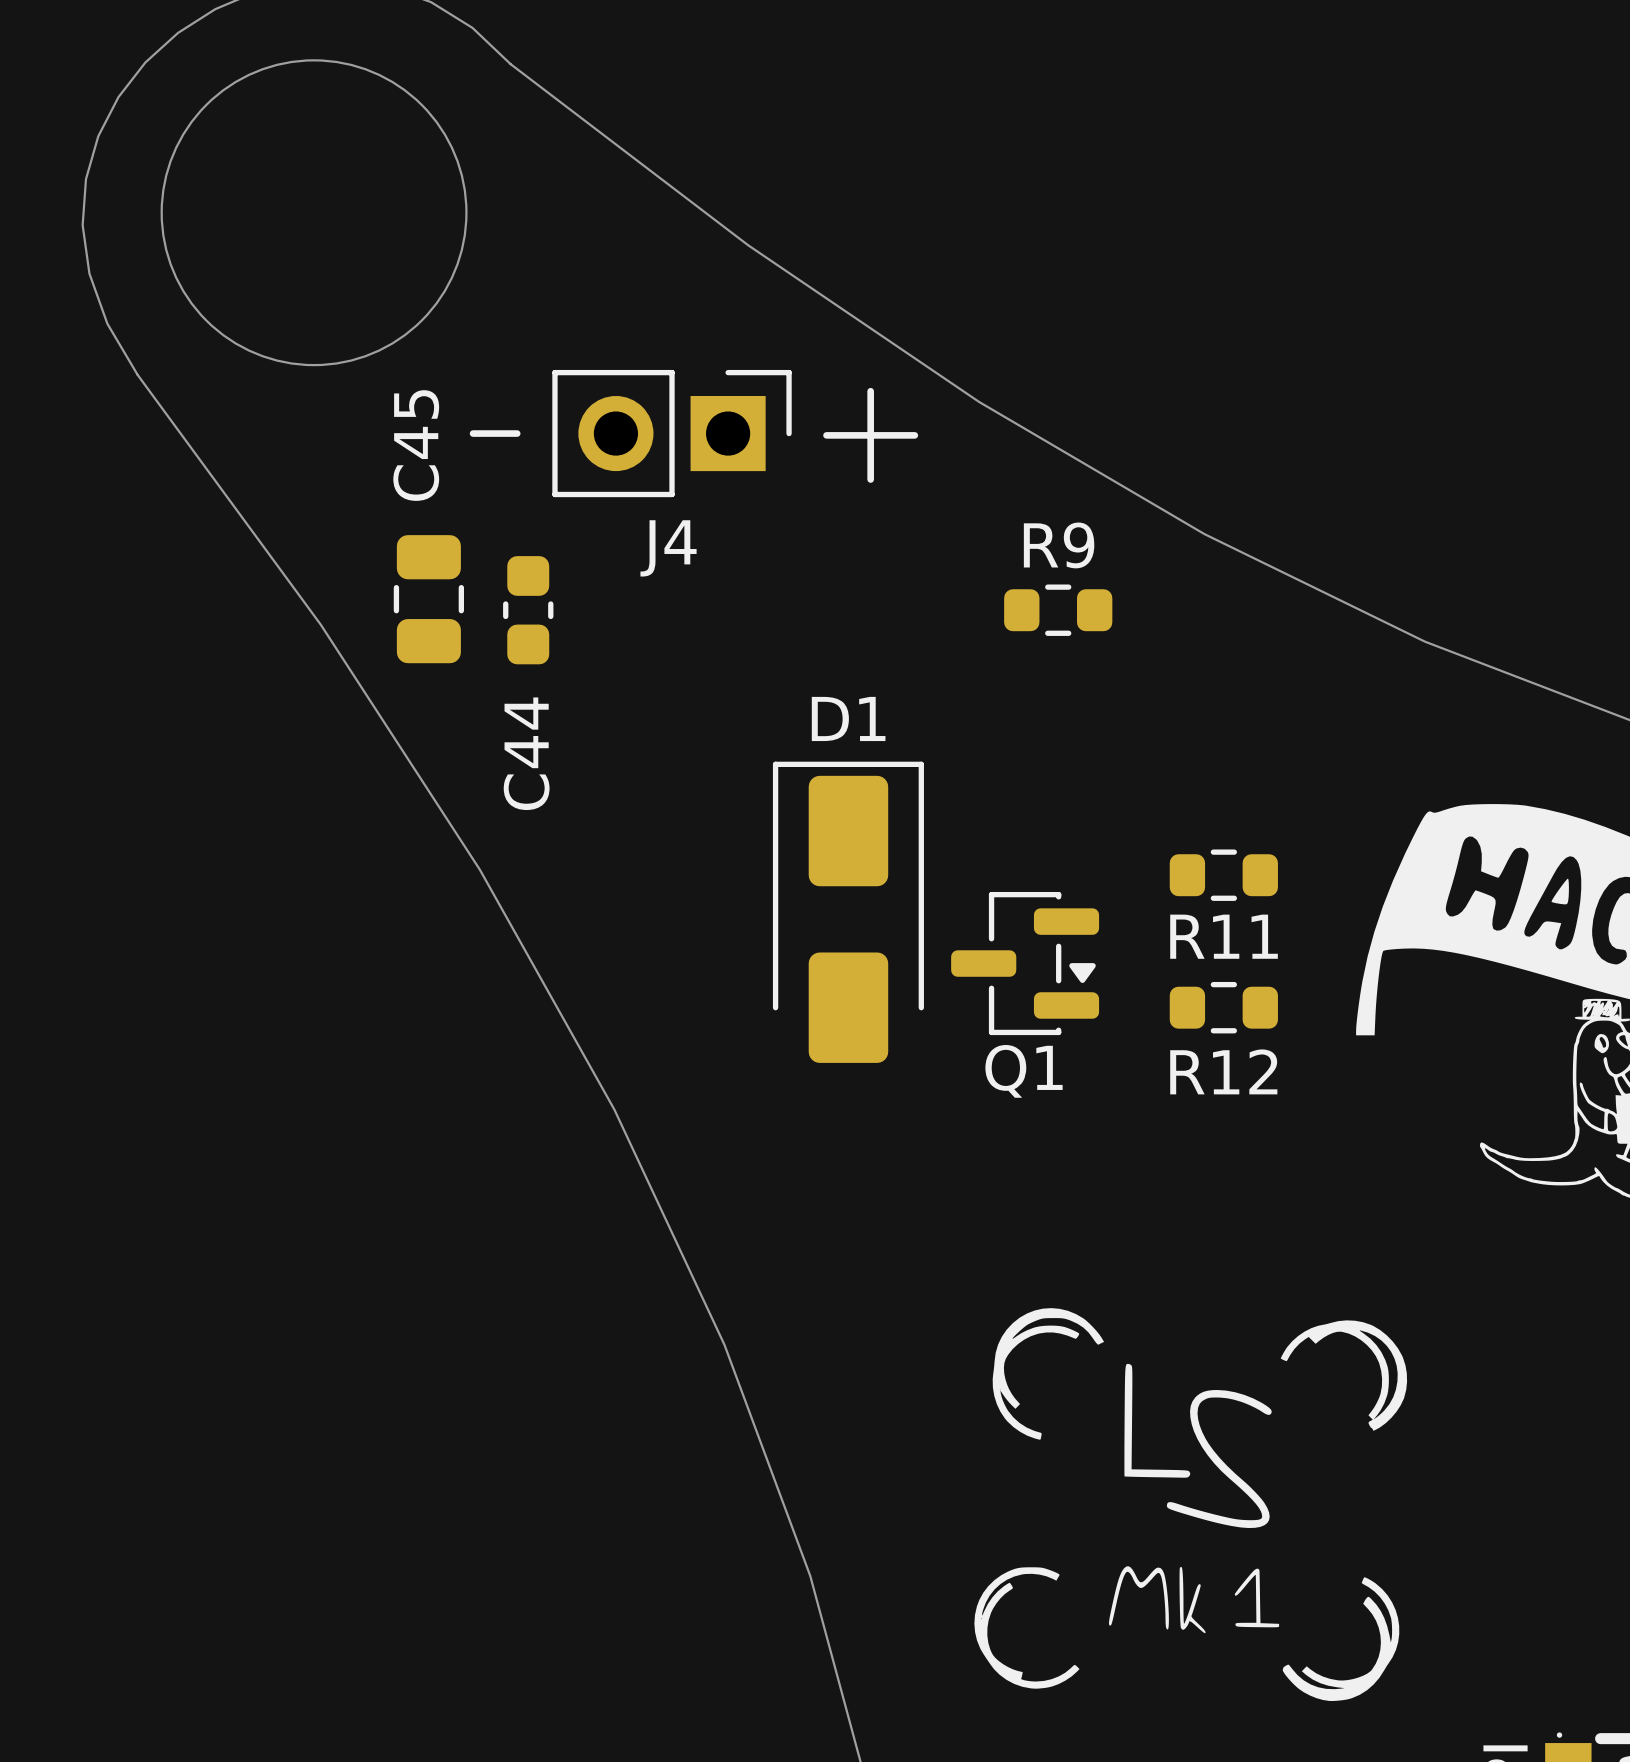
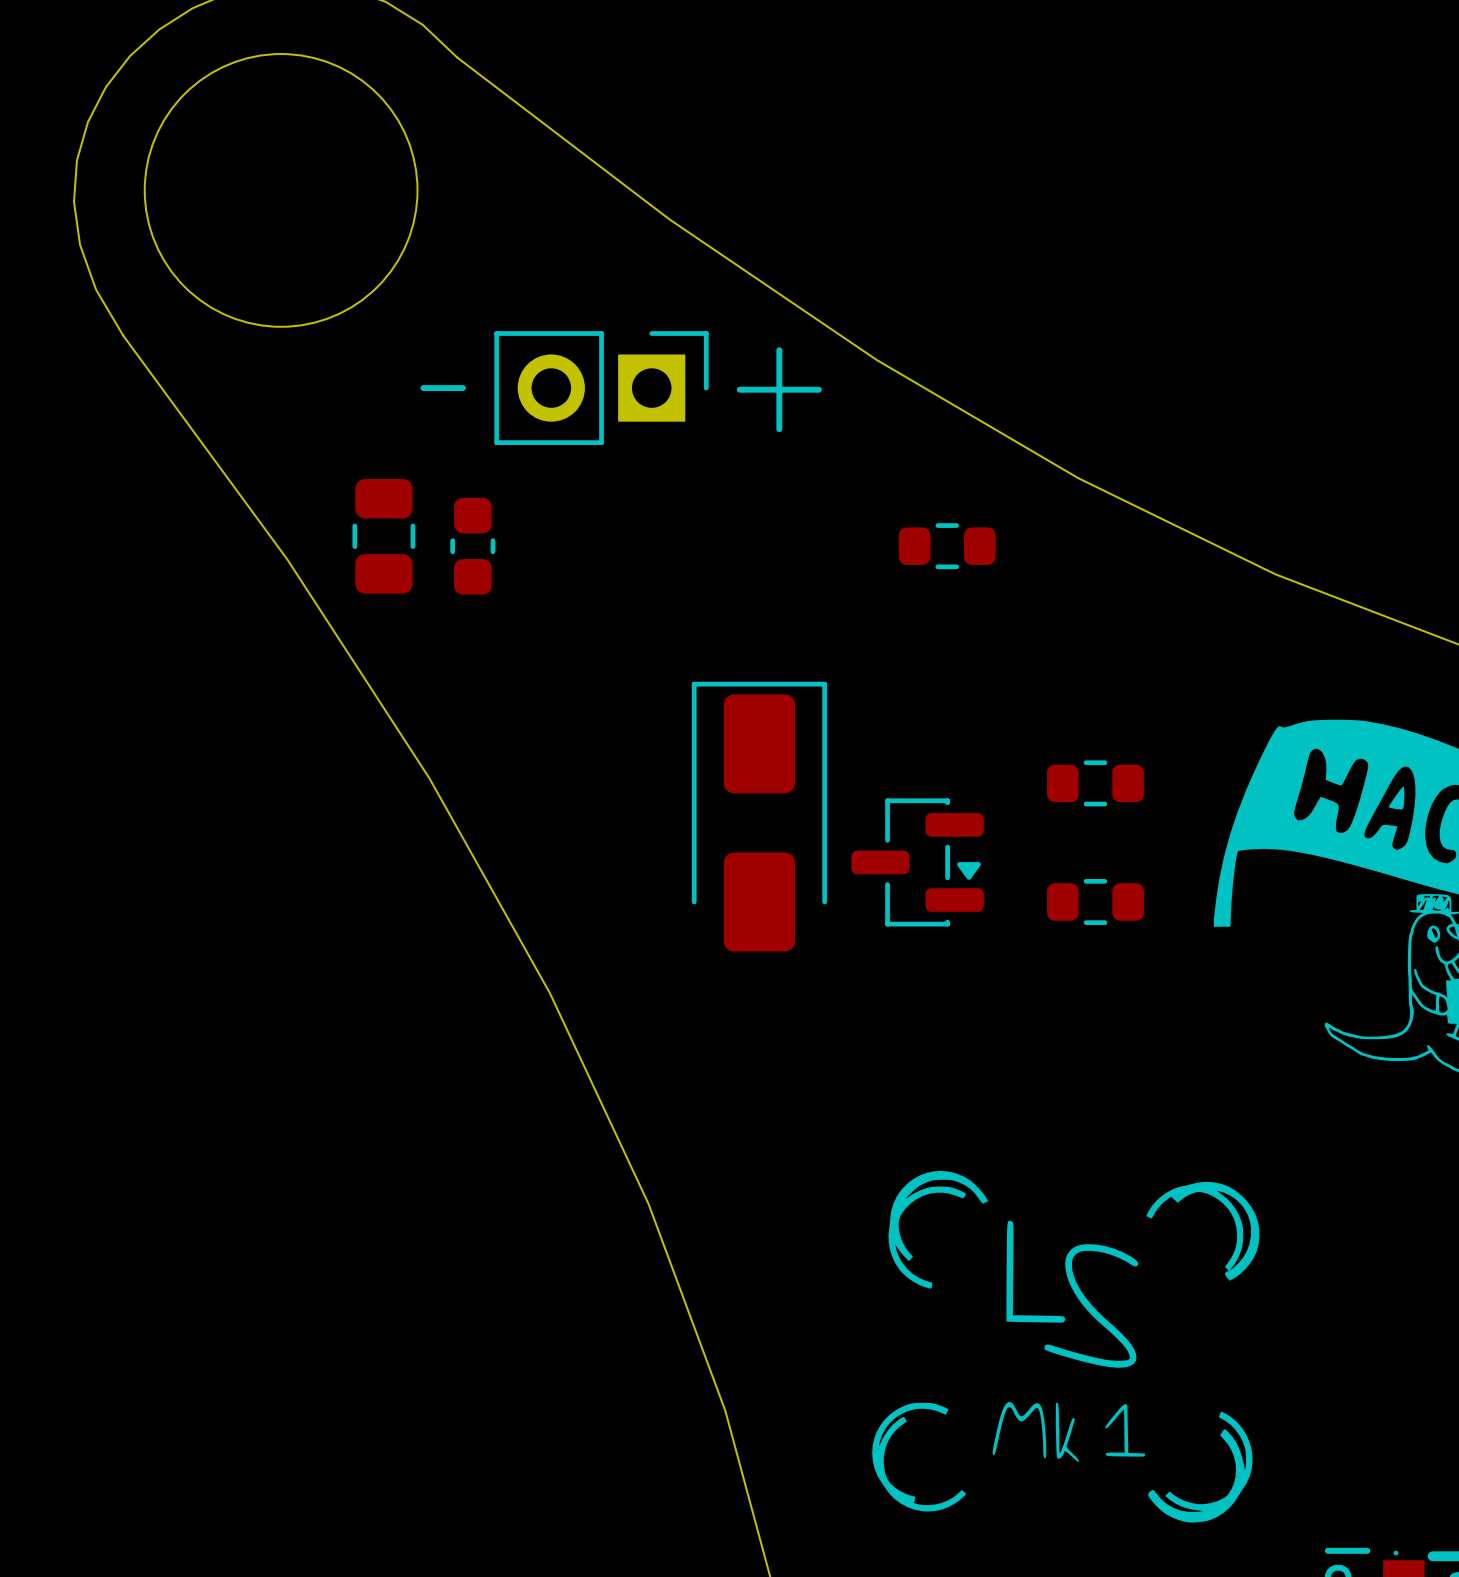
C45 name: C45 (416, 445) -> none
R9 name: R9 (1059, 545) -> none
J4 name: J4 (668, 548) -> none
D1 name: D1 (848, 718) -> none
C44 name: C44 (526, 753) -> none
R11 name: R11 (1224, 936) -> none
Q1 name: Q1 (1024, 1071) -> none
R12 name: R12 (1223, 1071) -> none

